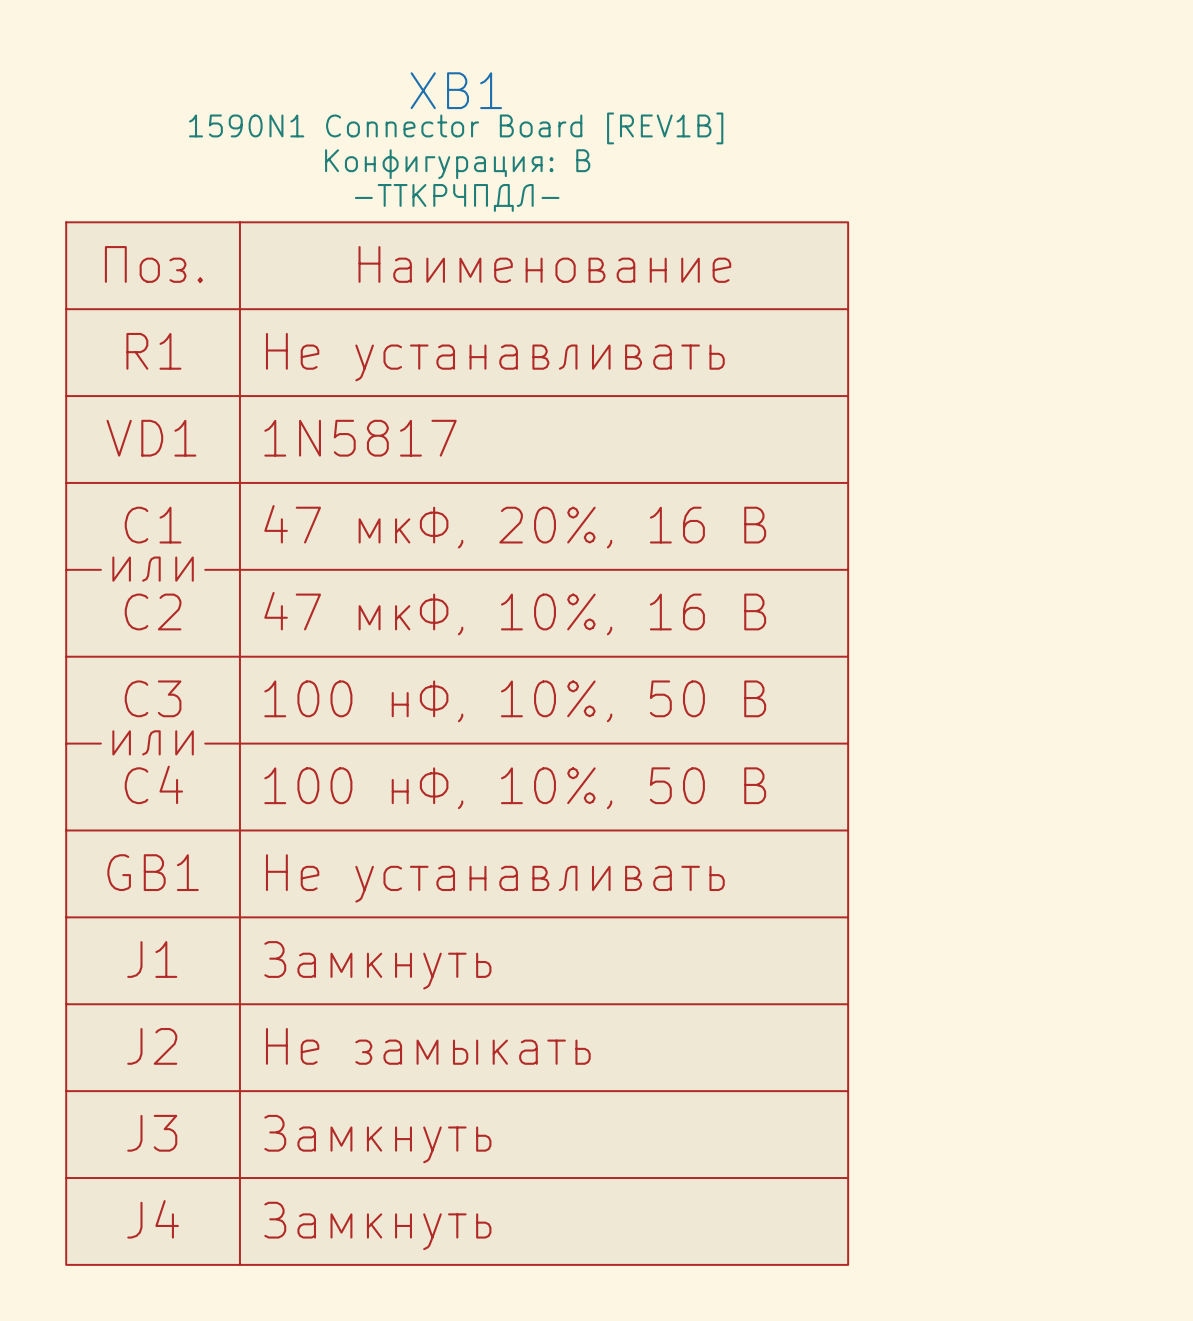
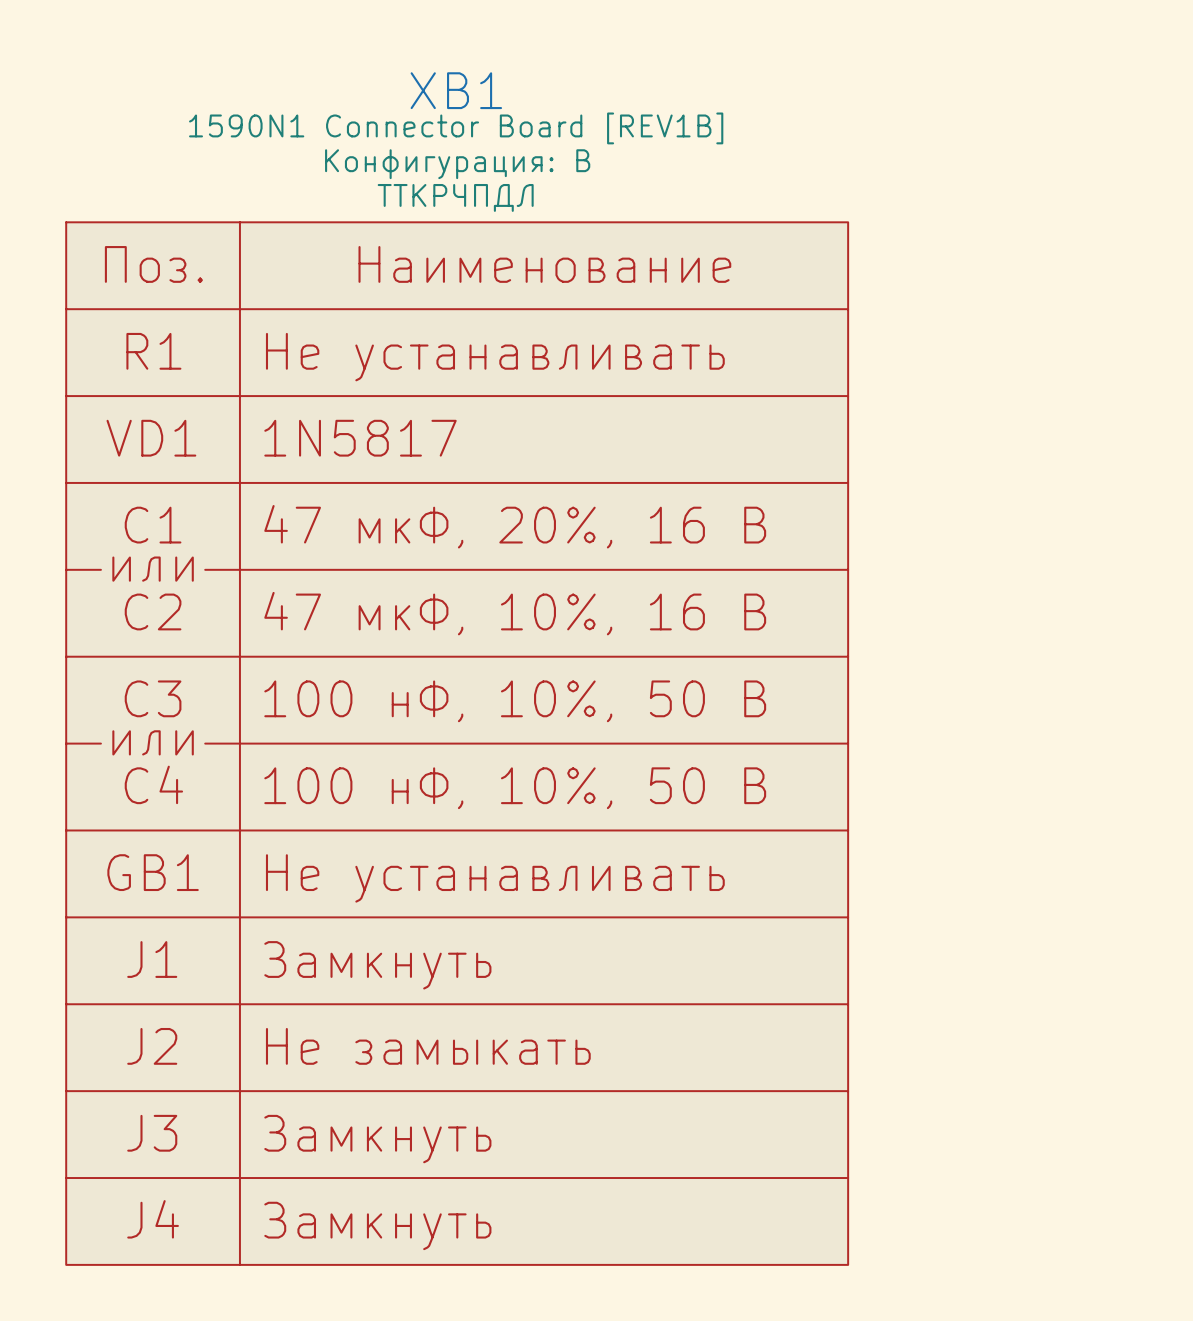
XB1 text: -ТТКРЧПДЛ- (457, 197) -> ТТКРЧПДЛ (455, 197)

